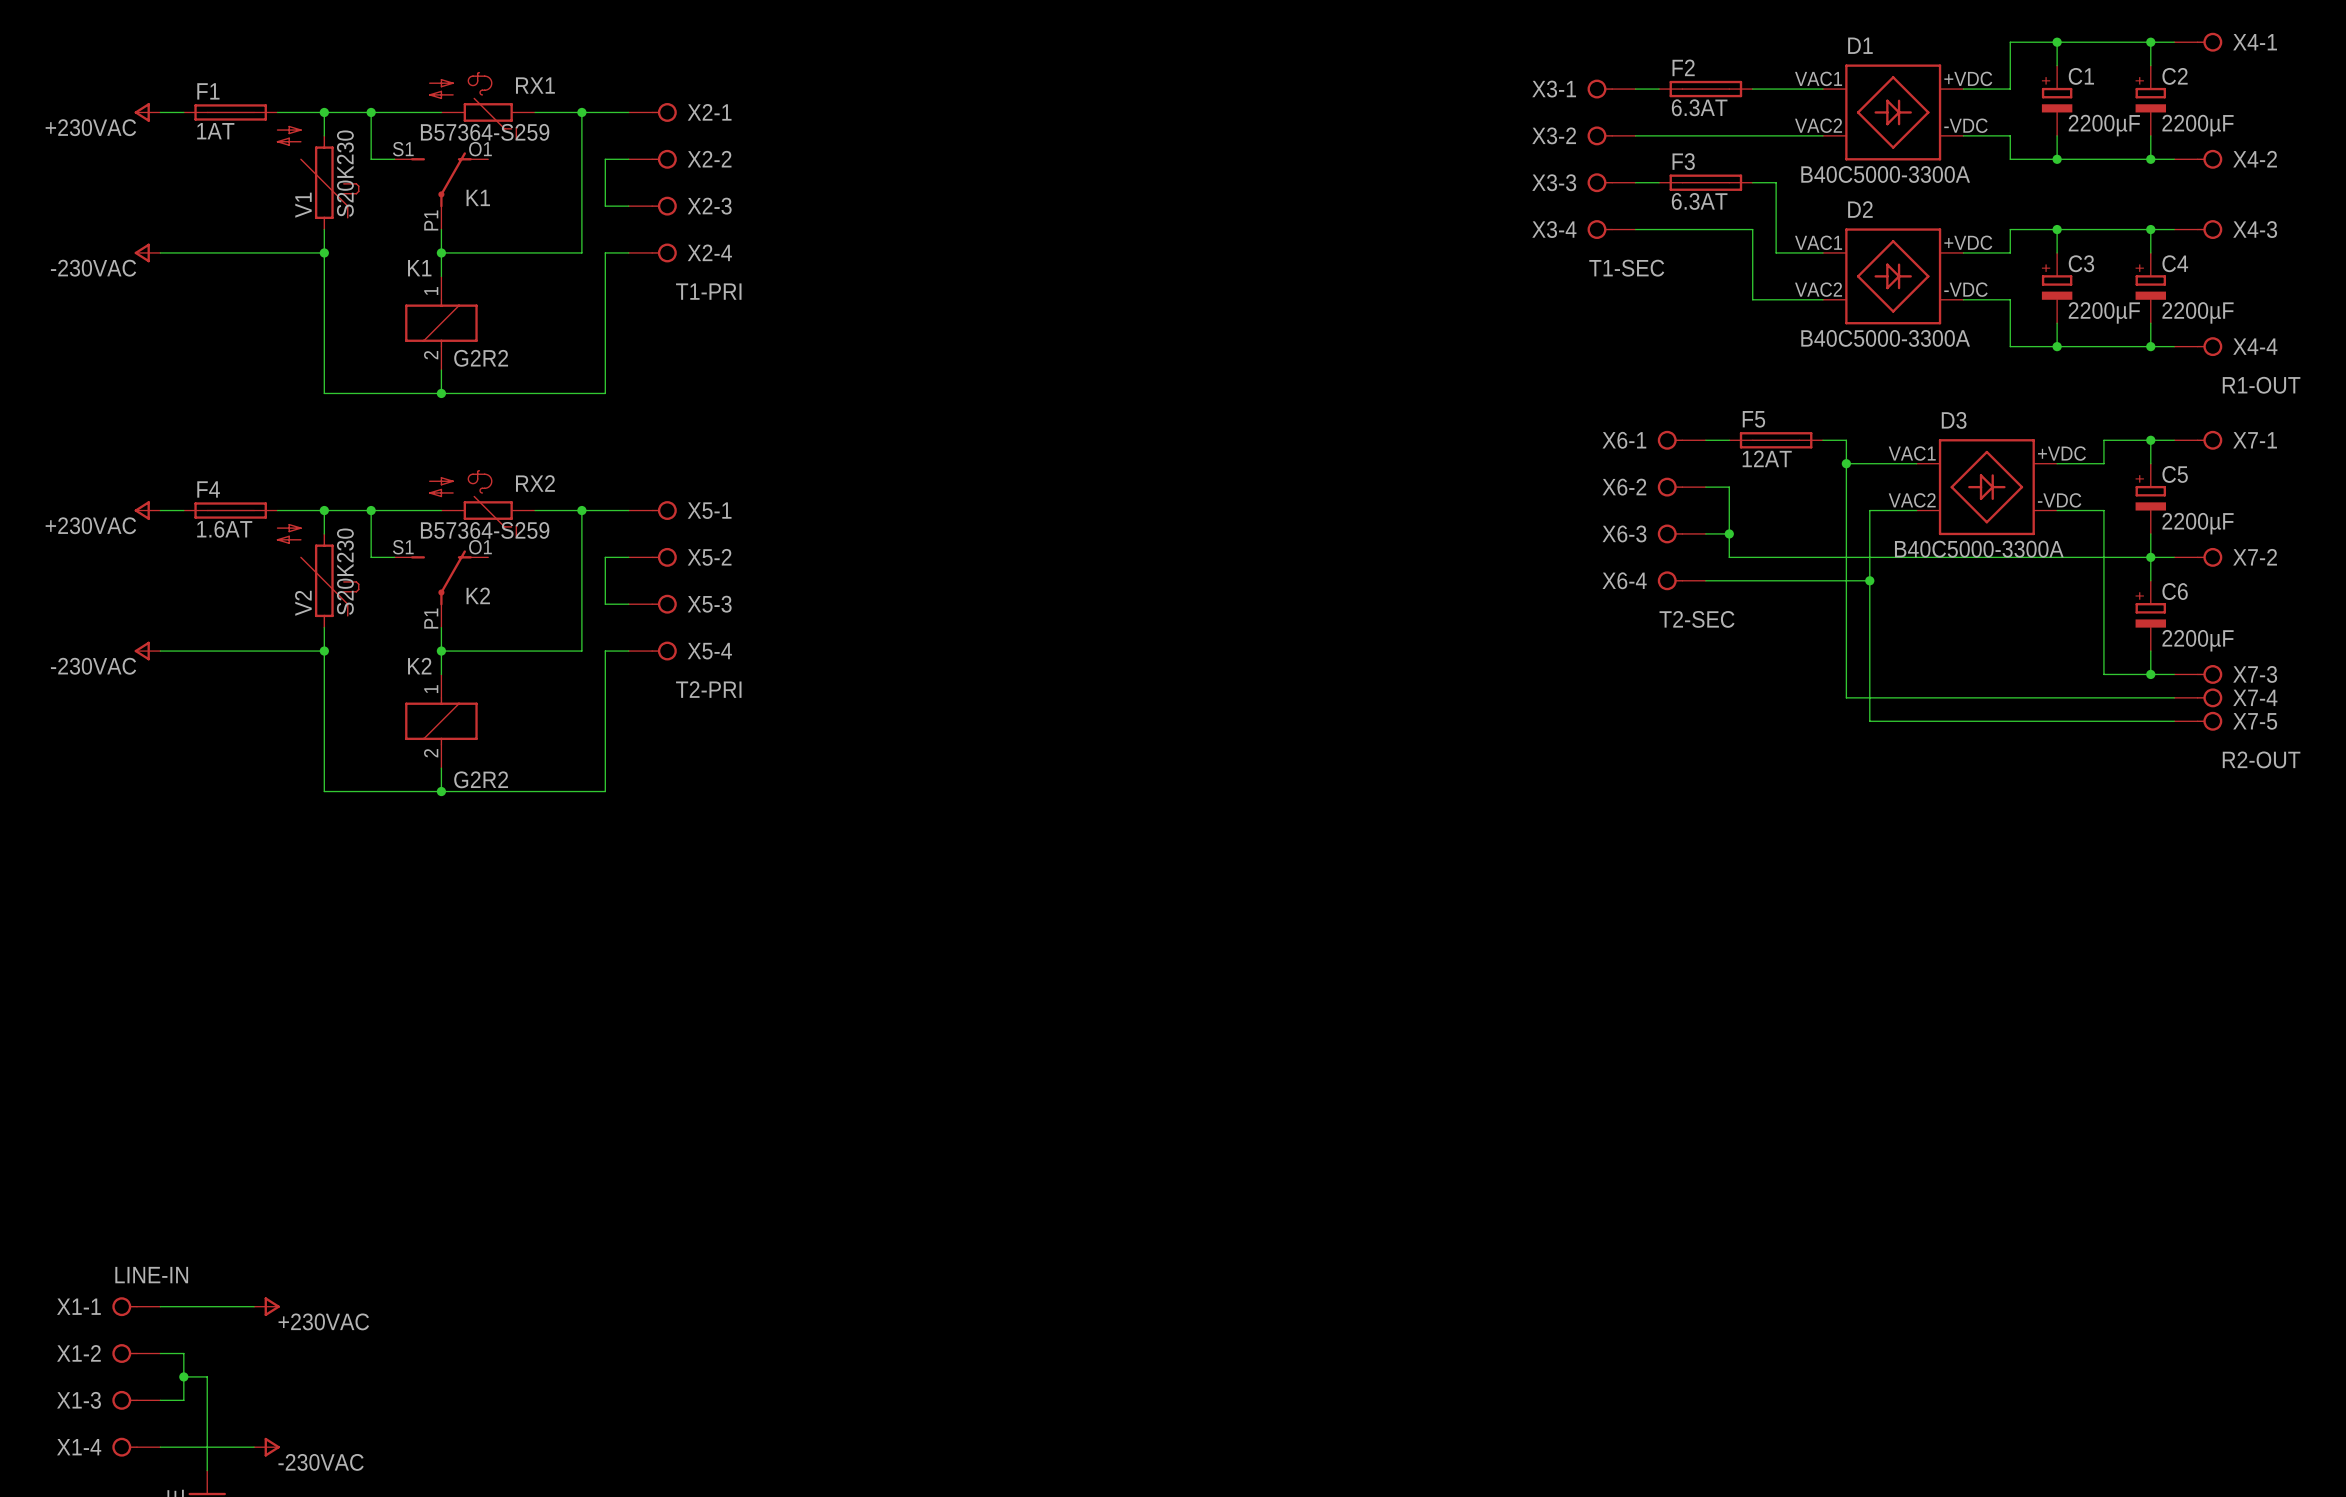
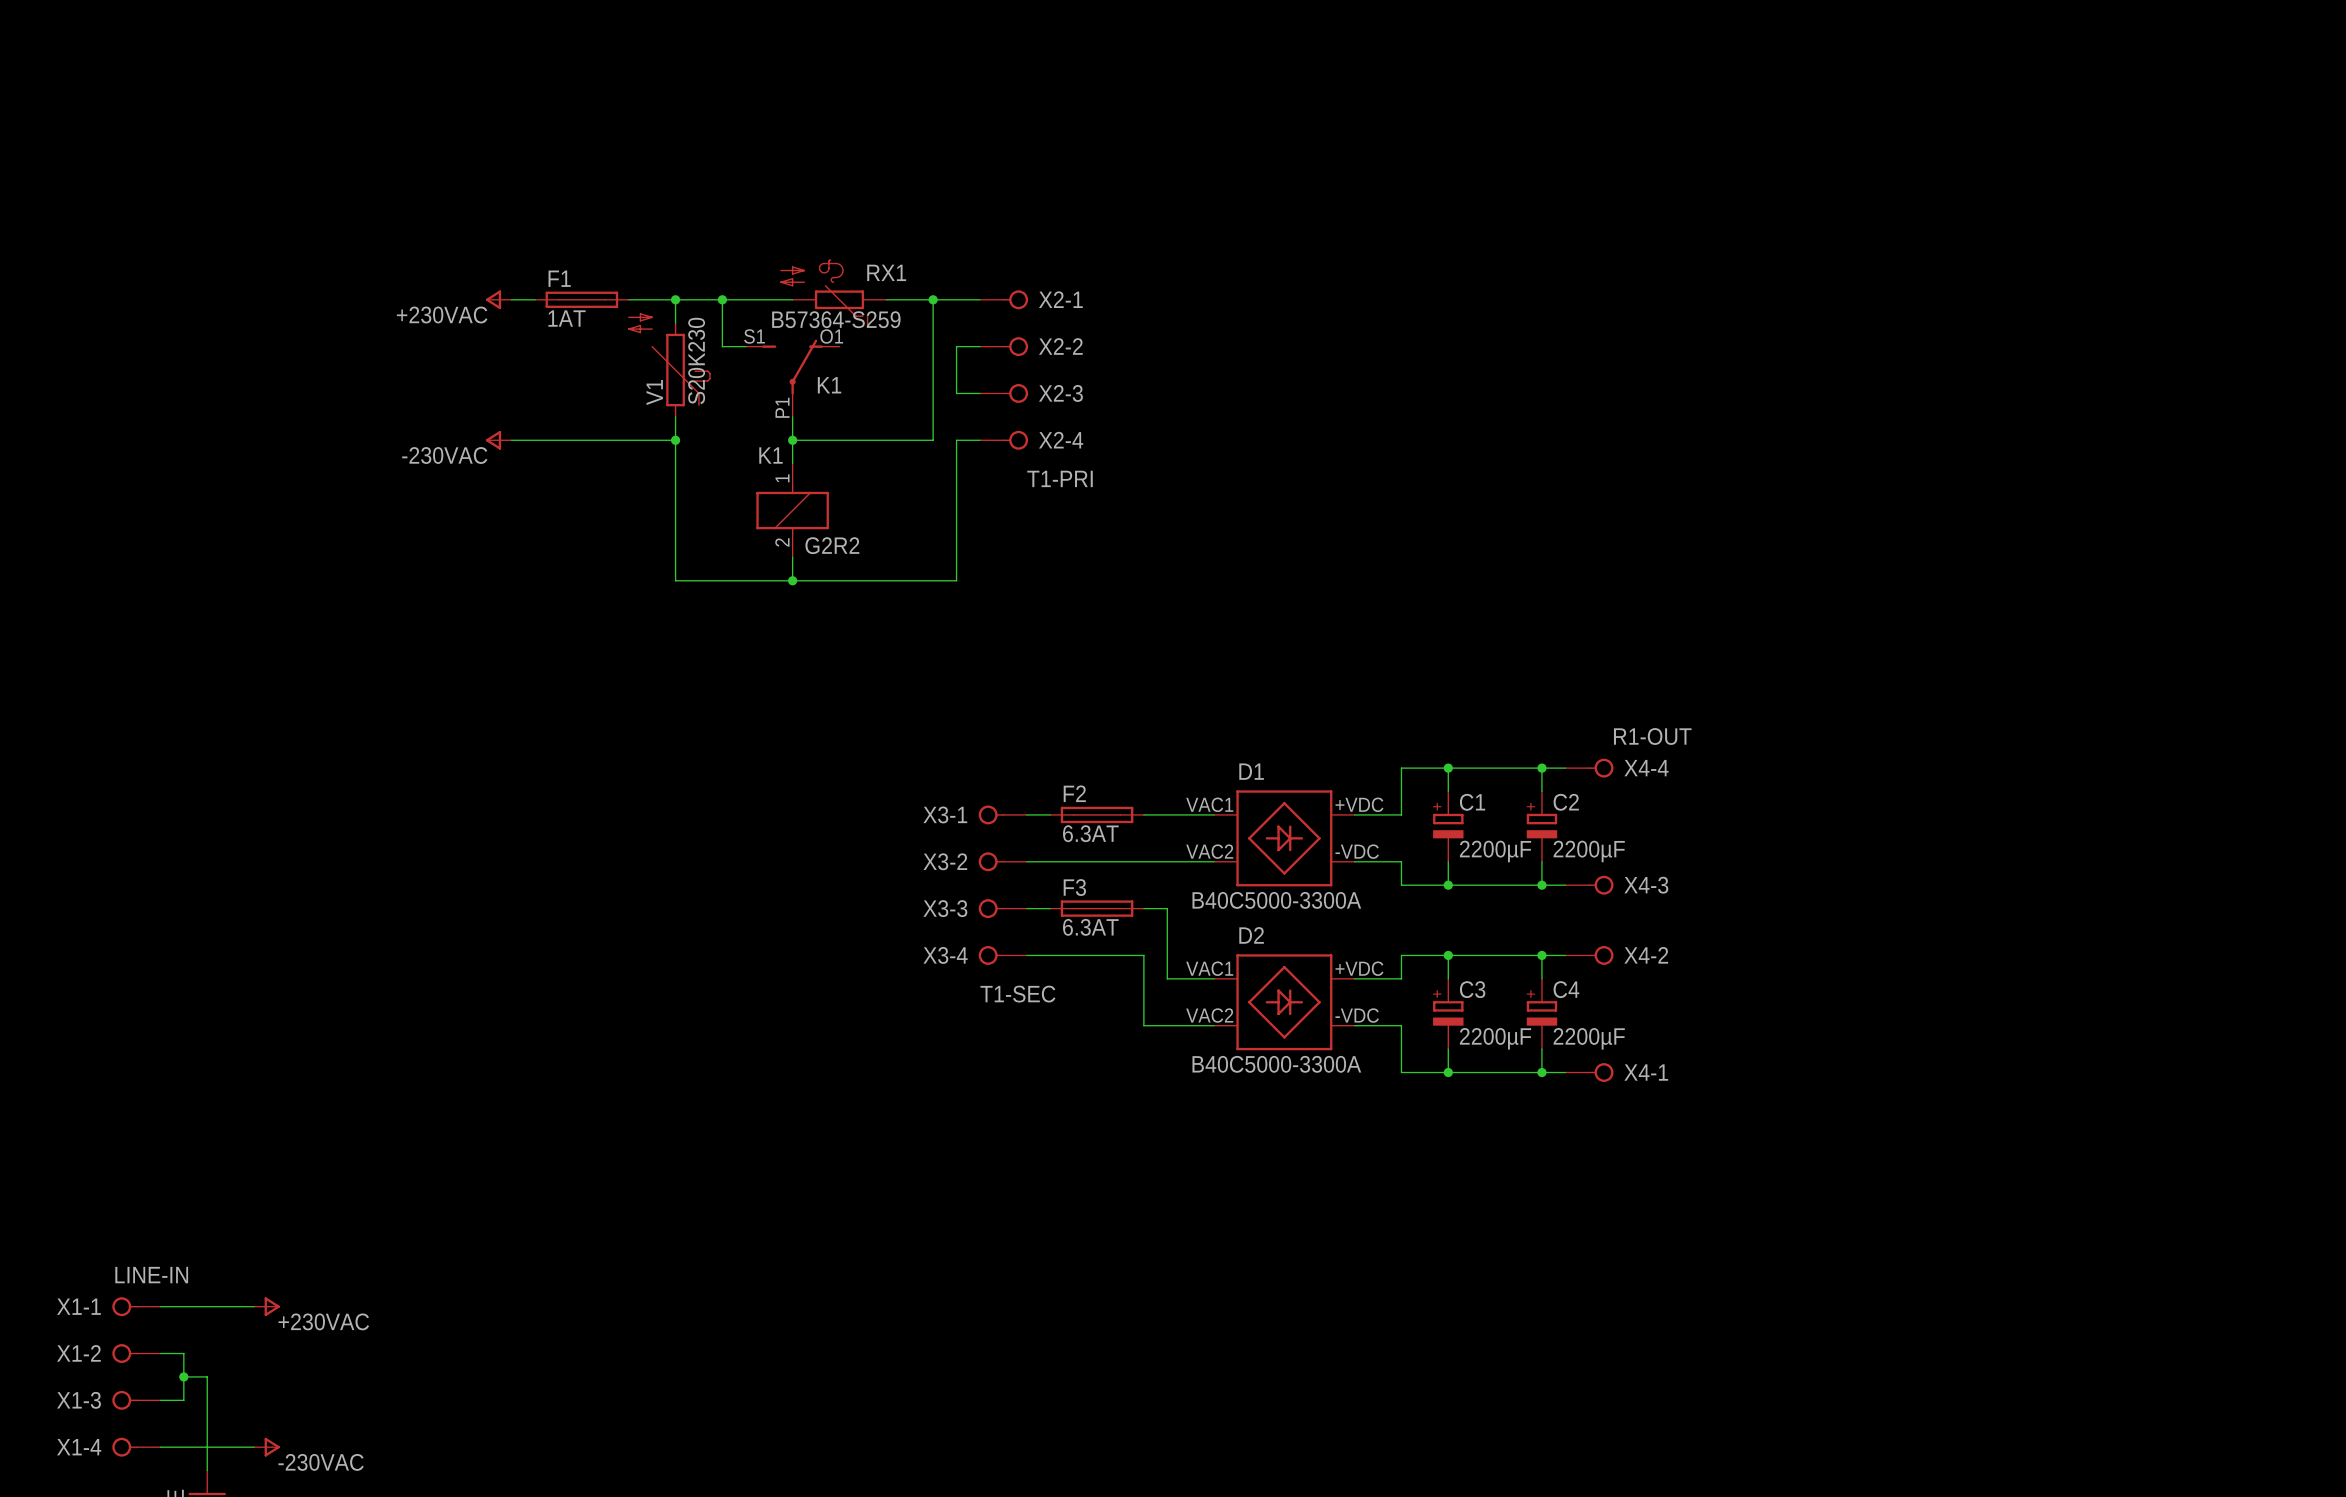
wire: (2057, 42) (2057, 65) -> none
junction: (2057, 42) -> none
wire: (2150, 42) (2150, 65) -> none
junction: (2150, 42) -> none
wire: (2174, 42) (2010, 42) (2010, 89) (1963, 89) -> none
X4-1 position: (2198, 42) -> (1589, 1072)
X3-1 position: (1611, 89) -> (1002, 814)
wire: (1635, 89) (1659, 89) -> none
F2 position: (1705, 89) -> (1097, 814)
wire: (1752, 89) (1822, 89) -> none
C1 position: (2057, 100) -> (1448, 826)
C2 position: (2150, 100) -> (1541, 826)
RX1 position: (482, 106) -> (833, 293)
power symbol: +230VAC (147, 112) -> none
wire: (160, 112) (183, 112) -> none
F1 position: (230, 112) -> (581, 299)
wire: (277, 112) (441, 112) -> none
wire: (324, 112) (324, 135) -> none
junction: (324, 112) -> none
wire: (371, 112) (371, 159) (394, 159) -> none
junction: (371, 112) -> none
wire: (535, 112) (628, 112) -> none
wire: (581, 112) (581, 252) (441, 252) -> none
junction: (581, 112) -> none
X2-1 position: (652, 112) -> (1004, 299)
D1 position: (1893, 112) -> (1284, 838)
X3-2 position: (1611, 135) -> (1002, 861)
wire: (1635, 135) (1822, 135) -> none
wire: (1963, 135) (2010, 135) (2010, 159) (2174, 159) -> none
wire: (2057, 135) (2057, 159) -> none
wire: (2150, 135) (2150, 159) -> none
wire: (628, 159) (605, 159) (605, 206) (628, 206) -> none
X2-2 position: (652, 159) -> (1004, 346)
junction: (2057, 159) -> none
junction: (2150, 159) -> none
X4-2 position: (2198, 159) -> (1589, 955)
V1 position: (318, 178) -> (669, 365)
X3-3 position: (1611, 182) -> (1002, 908)
wire: (1635, 182) (1659, 182) -> none
F3 position: (1705, 182) -> (1097, 908)
wire: (1752, 182) (1776, 182) (1776, 252) (1822, 252) -> none
K1: (441, 190) -> none
X2-3 position: (652, 206) -> (1004, 393)
wire: (324, 229) (324, 393) (605, 393) (605, 252) (628, 252) -> none
wire: (441, 229) (441, 276) -> none
X3-4 position: (1611, 229) -> (1002, 955)
wire: (1635, 229) (1752, 229) (1752, 299) (1822, 299) -> none
wire: (2057, 229) (2057, 252) -> none
junction: (2057, 229) -> none
wire: (2150, 229) (2150, 252) -> none
junction: (2150, 229) -> none
wire: (2174, 229) (2010, 229) (2010, 252) (1963, 252) -> none
X4-3 position: (2198, 229) -> (1589, 885)
power symbol: -230VAC (147, 252) -> none
wire: (160, 252) (324, 252) -> none
junction: (324, 252) -> none
junction: (441, 252) -> none
X2-4 position: (652, 252) -> (1004, 440)
D2 position: (1893, 276) -> (1284, 1002)
C3 position: (2057, 288) -> (1448, 1013)
C4 position: (2150, 288) -> (1541, 1013)
power symbol: none -> +230VAC (498, 299)
wire: none -> (511, 299) (535, 299)
wire: none -> (628, 299) (792, 299)
wire: none -> (675, 299) (675, 323)
junction: none -> (675, 299)
wire: none -> (722, 299) (722, 346) (745, 346)
junction: none -> (722, 299)
wire: none -> (886, 299) (979, 299)
wire: none -> (933, 299) (933, 440) (792, 440)
junction: none -> (933, 299)
wire: (1963, 299) (2010, 299) (2010, 346) (2174, 346) -> none
K1: G2R2 (441, 323) -> none
wire: (2057, 323) (2057, 346) -> none
wire: (2150, 323) (2150, 346) -> none
wire: none -> (979, 346) (956, 346) (956, 393) (979, 393)
junction: (2057, 346) -> none
junction: (2150, 346) -> none
X4-4 position: (2198, 346) -> (1589, 768)
wire: (441, 370) (441, 393) -> none
K1: none -> (792, 378)
X4-4 value position: R1-OUT (2261, 385) -> R1-OUT (1652, 736)
junction: (441, 393) -> none
wire: none -> (675, 416) (675, 580) (956, 580) (956, 440) (979, 440)
wire: none -> (792, 416) (792, 463)
power symbol: none -> -230VAC (498, 440)
wire: none -> (511, 440) (675, 440)
junction: none -> (675, 440)
junction: none -> (792, 440)
X6-1: (1681, 440) -> none
wire: (1705, 440) (1729, 440) -> none
F5: 12AT (1776, 440) -> none
wire: (1822, 440) (1846, 440) (1846, 697) (2174, 697) -> none
wire: (2150, 440) (2150, 463) -> none
junction: (2150, 440) -> none
wire: (2174, 440) (2103, 440) (2103, 463) (2057, 463) -> none
X7-1: (2198, 440) -> none
wire: (1846, 463) (1916, 463) -> none
junction: (1846, 463) -> none
X6-2: (1681, 487) -> none
wire: (1705, 487) (1729, 487) (1729, 557) (2174, 557) -> none
D3: B40C5000-3300A (1986, 487) -> none
C5: 2200µF (2150, 498) -> none
RX2: B57364-S259 (482, 504) -> none
power symbol: +230VAC (147, 510) -> none
wire: (160, 510) (183, 510) -> none
F4: 1.6AT (230, 510) -> none
wire: (277, 510) (441, 510) -> none
wire: (324, 510) (324, 533) -> none
junction: (324, 510) -> none
wire: (371, 510) (371, 557) (394, 557) -> none
junction: (371, 510) -> none
wire: (535, 510) (628, 510) -> none
wire: (581, 510) (581, 651) (441, 651) -> none
junction: (581, 510) -> none
X5-1: (652, 510) -> none
K1: none -> G2R2 (792, 510)
wire: (1916, 510) (1869, 510) (1869, 721) (2174, 721) -> none
wire: (2057, 510) (2103, 510) (2103, 674) (2174, 674) -> none
X6-3: (1681, 533) -> none
wire: (1705, 533) (1729, 533) -> none
junction: (1729, 533) -> none
wire: (2150, 533) (2150, 580) -> none
wire: (628, 557) (605, 557) (605, 604) (628, 604) -> none
X5-2: (652, 557) -> none
wire: none -> (792, 557) (792, 580)
junction: (2150, 557) -> none
X7-2: (2198, 557) -> none
V2: S20K230 (318, 576) -> none
junction: none -> (792, 580)
X6-4: T2-SEC (1681, 580) -> none
wire: (1705, 580) (1869, 580) -> none
junction: (1869, 580) -> none
K2: (441, 588) -> none
X5-3: (652, 604) -> none
C6: 2200µF (2150, 615) -> none
wire: (324, 627) (324, 791) (605, 791) (605, 651) (628, 651) -> none
wire: (441, 627) (441, 674) -> none
power symbol: -230VAC (147, 651) -> none
wire: (160, 651) (324, 651) -> none
junction: (324, 651) -> none
junction: (441, 651) -> none
X5-4: T2-PRI (652, 651) -> none
wire: (2150, 651) (2150, 674) -> none
junction: (2150, 674) -> none
X7-3: (2198, 674) -> none
X7-4: (2198, 697) -> none
K2: G2R2 (441, 721) -> none
X7-5: R2-OUT (2198, 721) -> none
wire: (441, 768) (441, 791) -> none
wire: none -> (1448, 768) (1448, 791)
junction: none -> (1448, 768)
wire: none -> (1541, 768) (1541, 791)
junction: none -> (1541, 768)
wire: none -> (1565, 768) (1401, 768) (1401, 814) (1354, 814)
junction: (441, 791) -> none
wire: none -> (1026, 814) (1050, 814)
wire: none -> (1143, 814) (1214, 814)
wire: none -> (1026, 861) (1214, 861)
wire: none -> (1354, 861) (1401, 861) (1401, 885) (1565, 885)
wire: none -> (1448, 861) (1448, 885)
wire: none -> (1541, 861) (1541, 885)
junction: none -> (1448, 885)
junction: none -> (1541, 885)
wire: none -> (1026, 908) (1050, 908)
wire: none -> (1143, 908) (1167, 908) (1167, 978) (1214, 978)
wire: none -> (1026, 955) (1143, 955) (1143, 1025) (1214, 1025)
wire: none -> (1448, 955) (1448, 978)
junction: none -> (1448, 955)
wire: none -> (1541, 955) (1541, 978)
junction: none -> (1541, 955)
wire: none -> (1565, 955) (1401, 955) (1401, 978) (1354, 978)
wire: none -> (1354, 1025) (1401, 1025) (1401, 1072) (1565, 1072)
wire: none -> (1448, 1049) (1448, 1072)
wire: none -> (1541, 1049) (1541, 1072)
junction: none -> (1448, 1072)
junction: none -> (1541, 1072)

